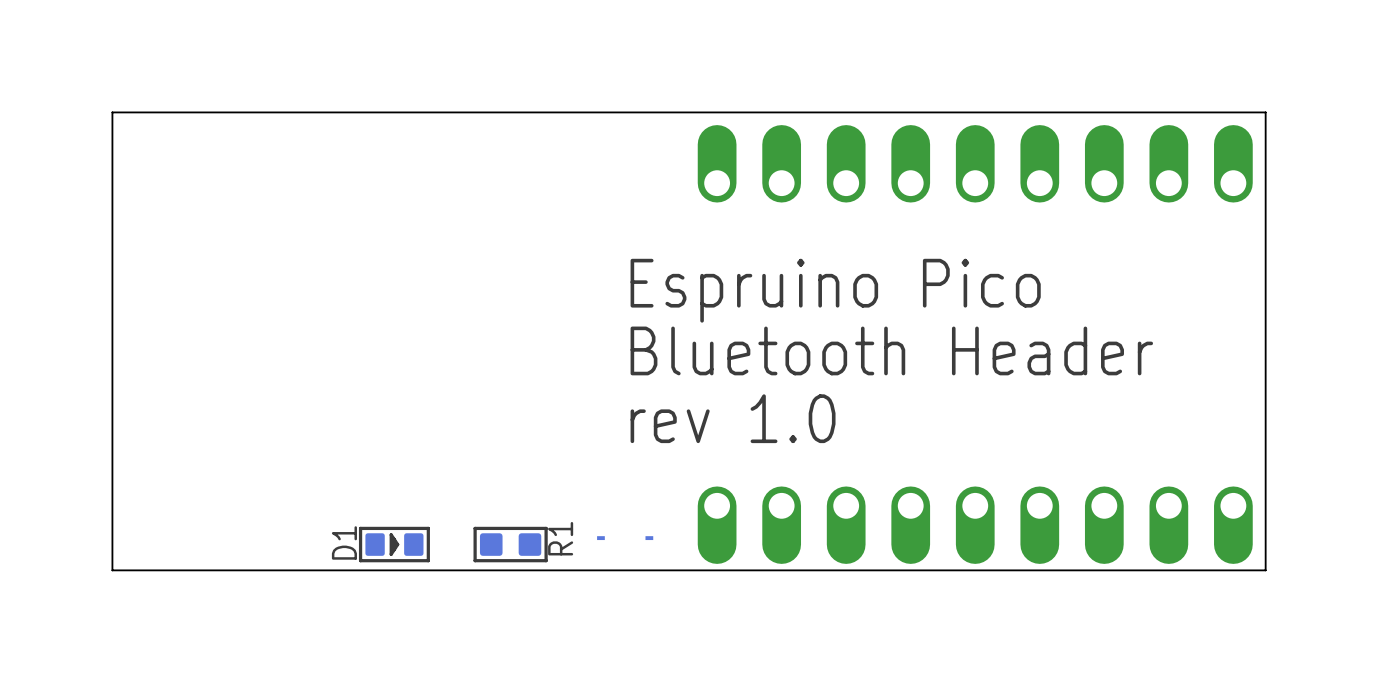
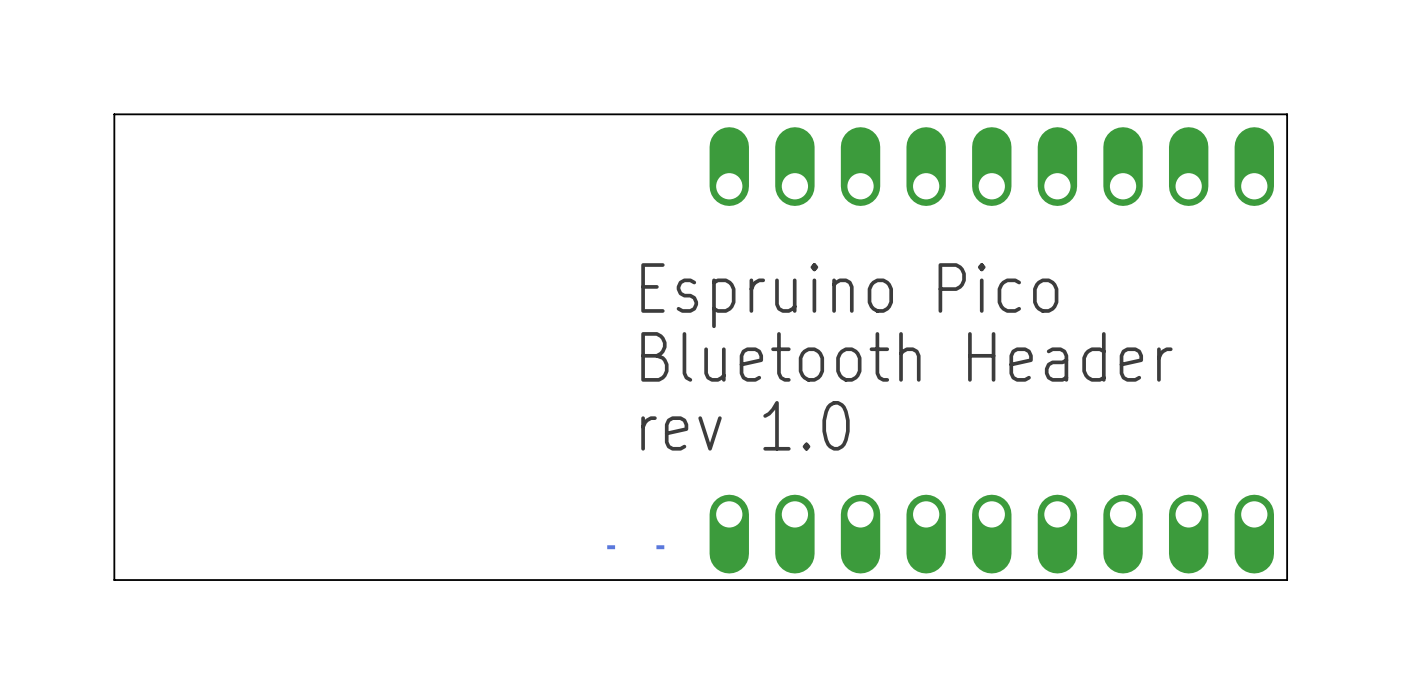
D1: (394, 544) -> none
R1: (510, 544) -> none

